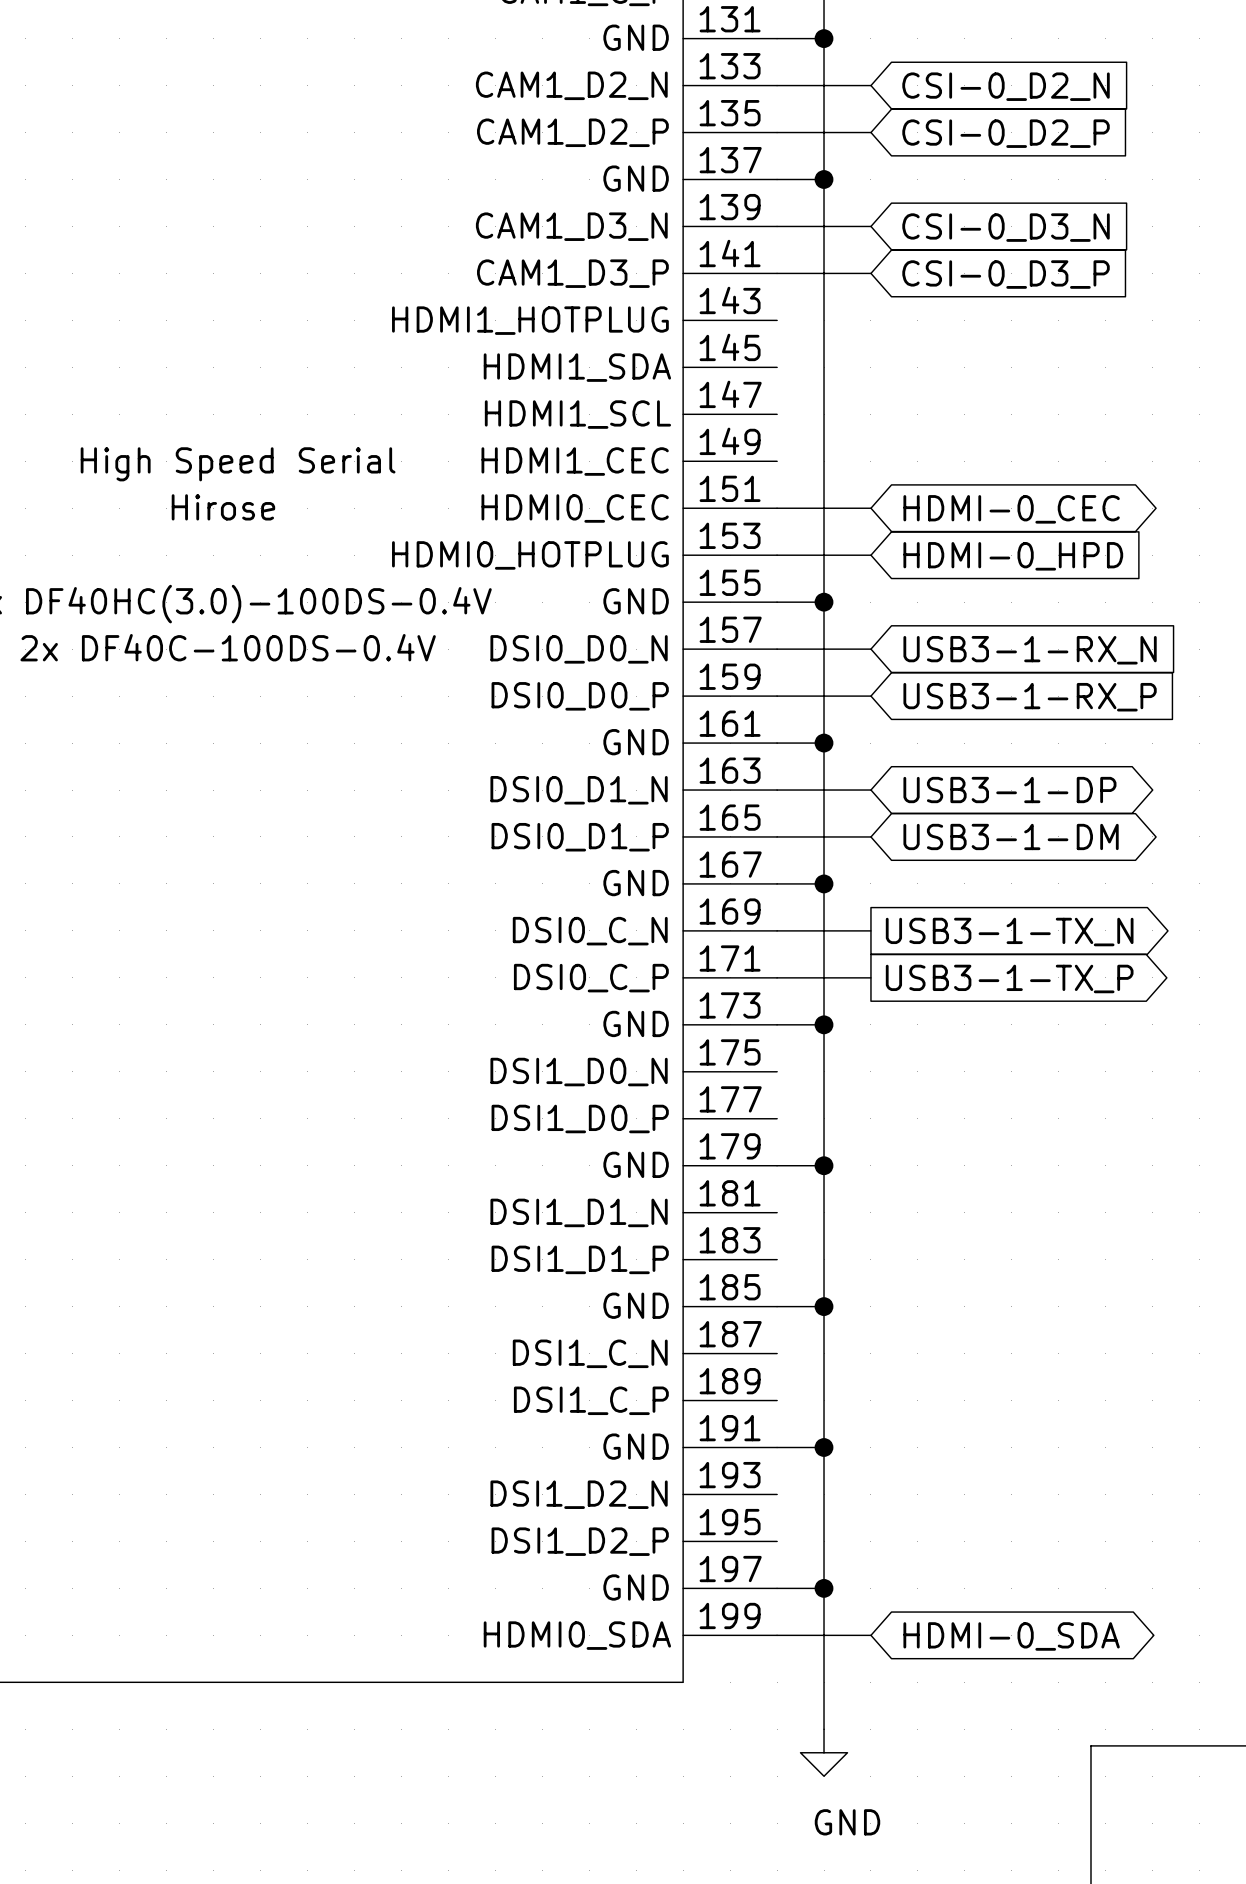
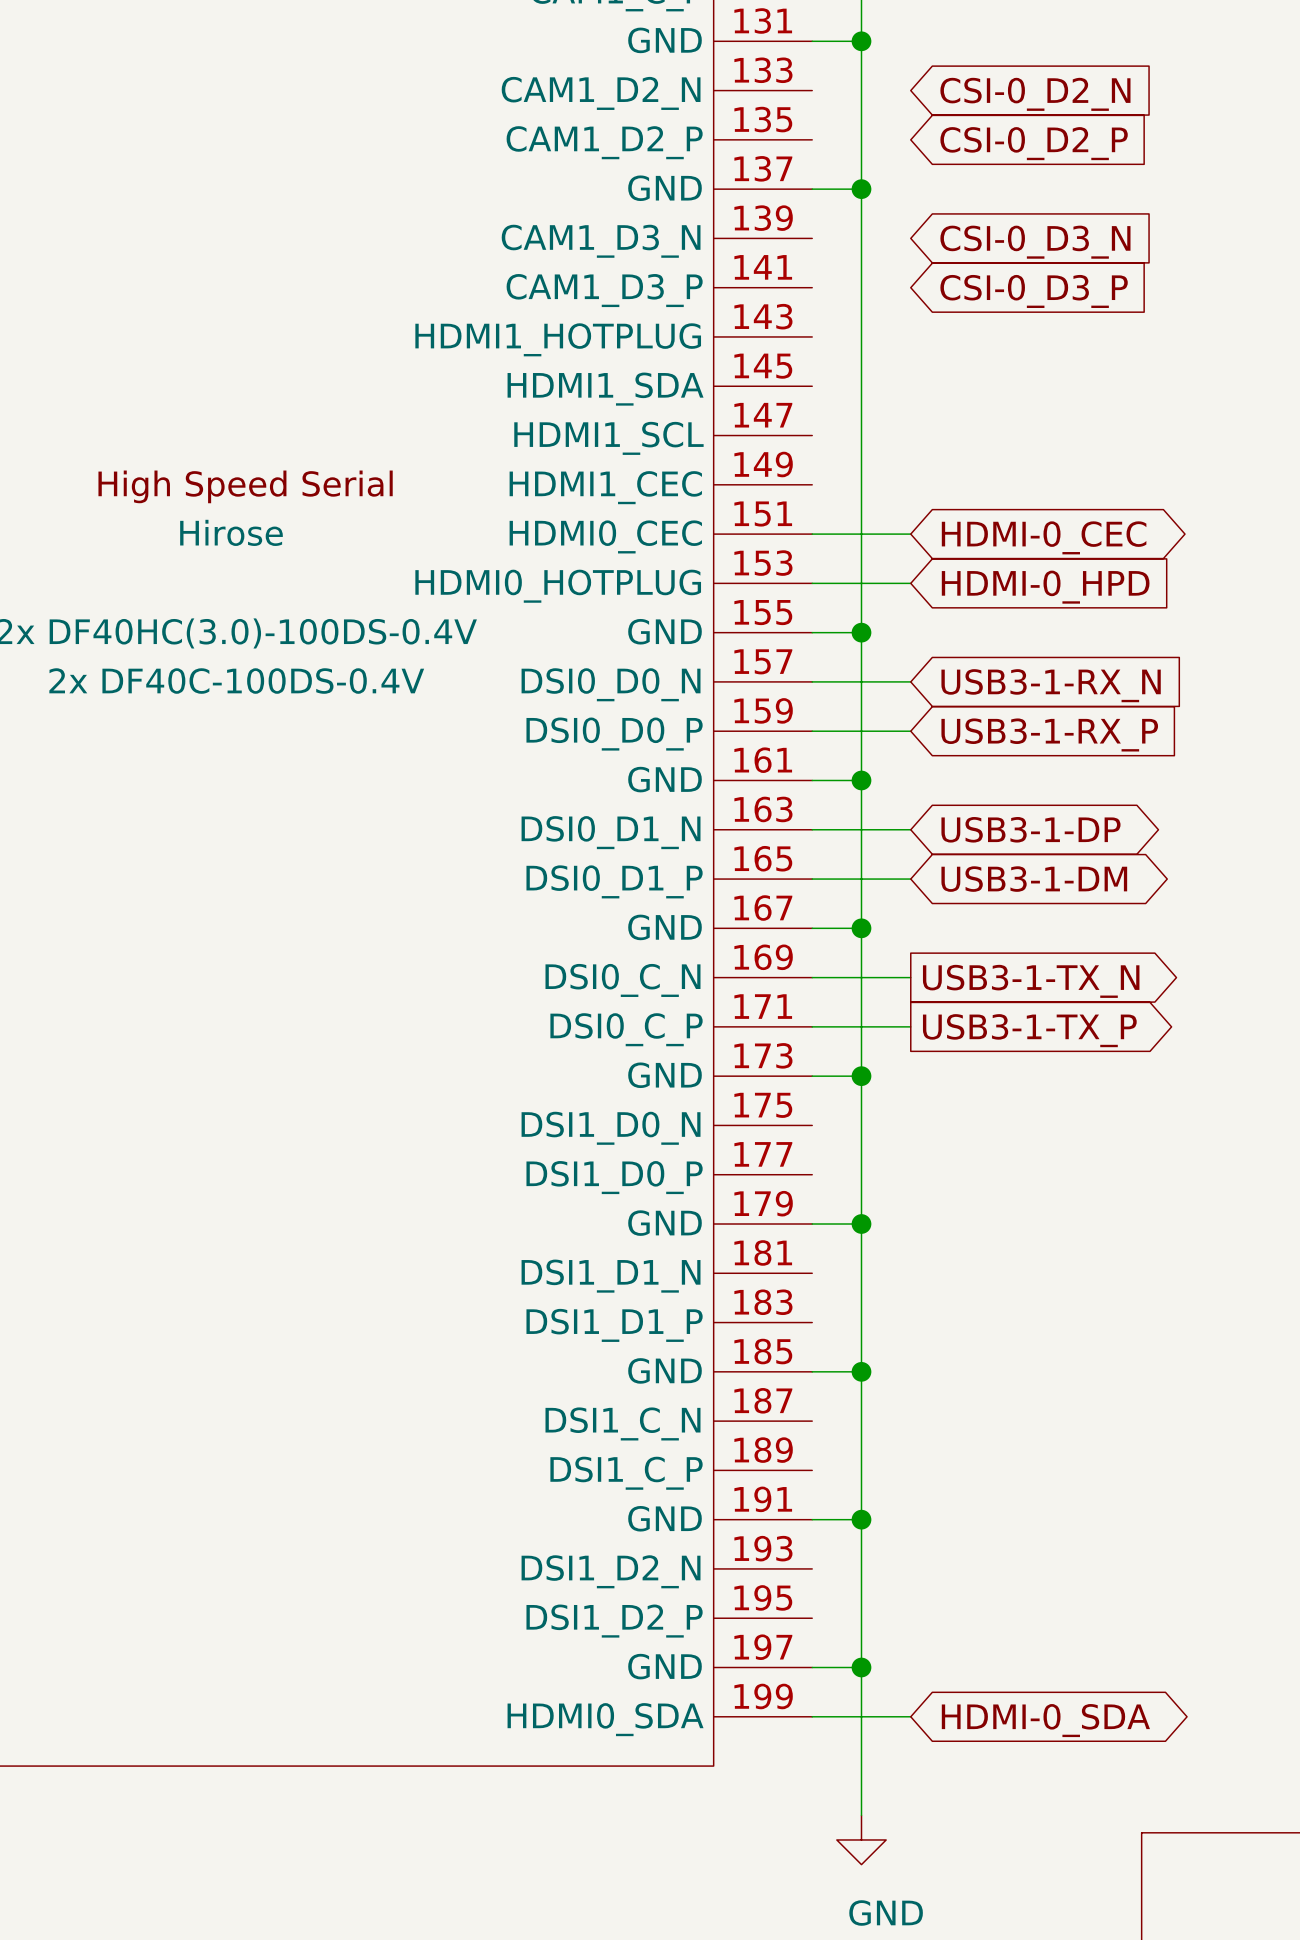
wire: (777, 85) (870, 85) -> none
wire: (777, 132) (870, 132) -> none
wire: (777, 226) (870, 226) -> none
wire: (777, 273) (870, 273) -> none

